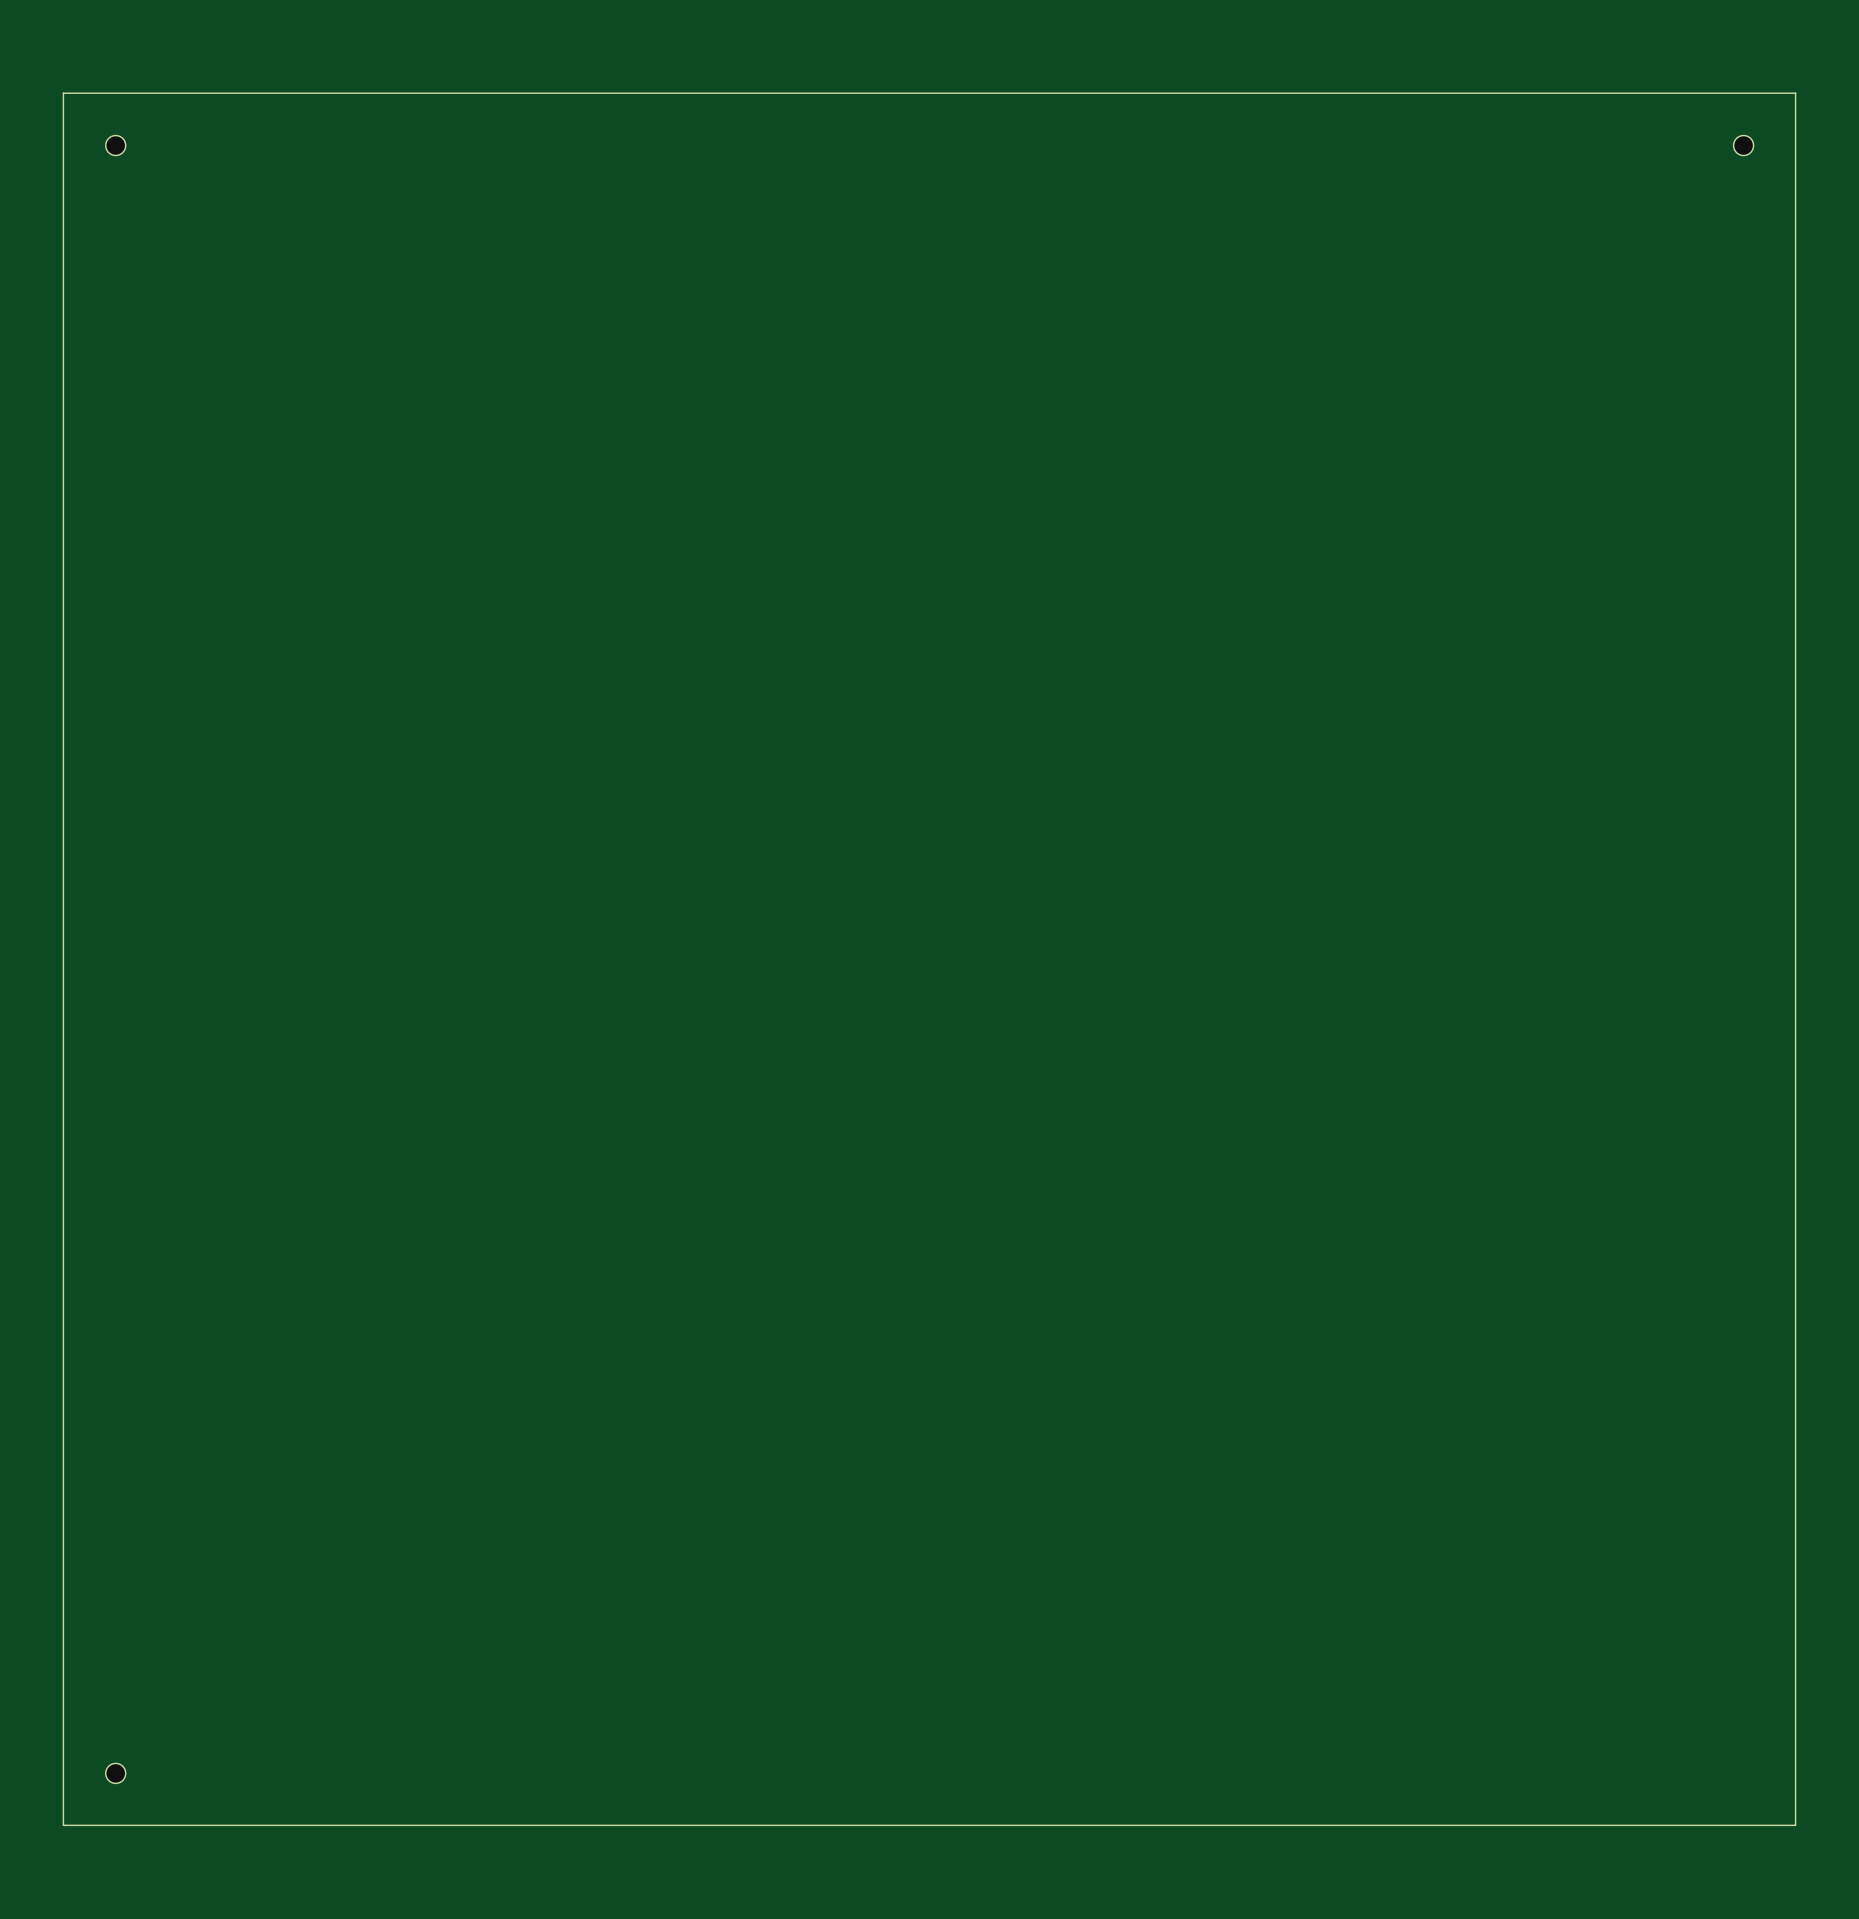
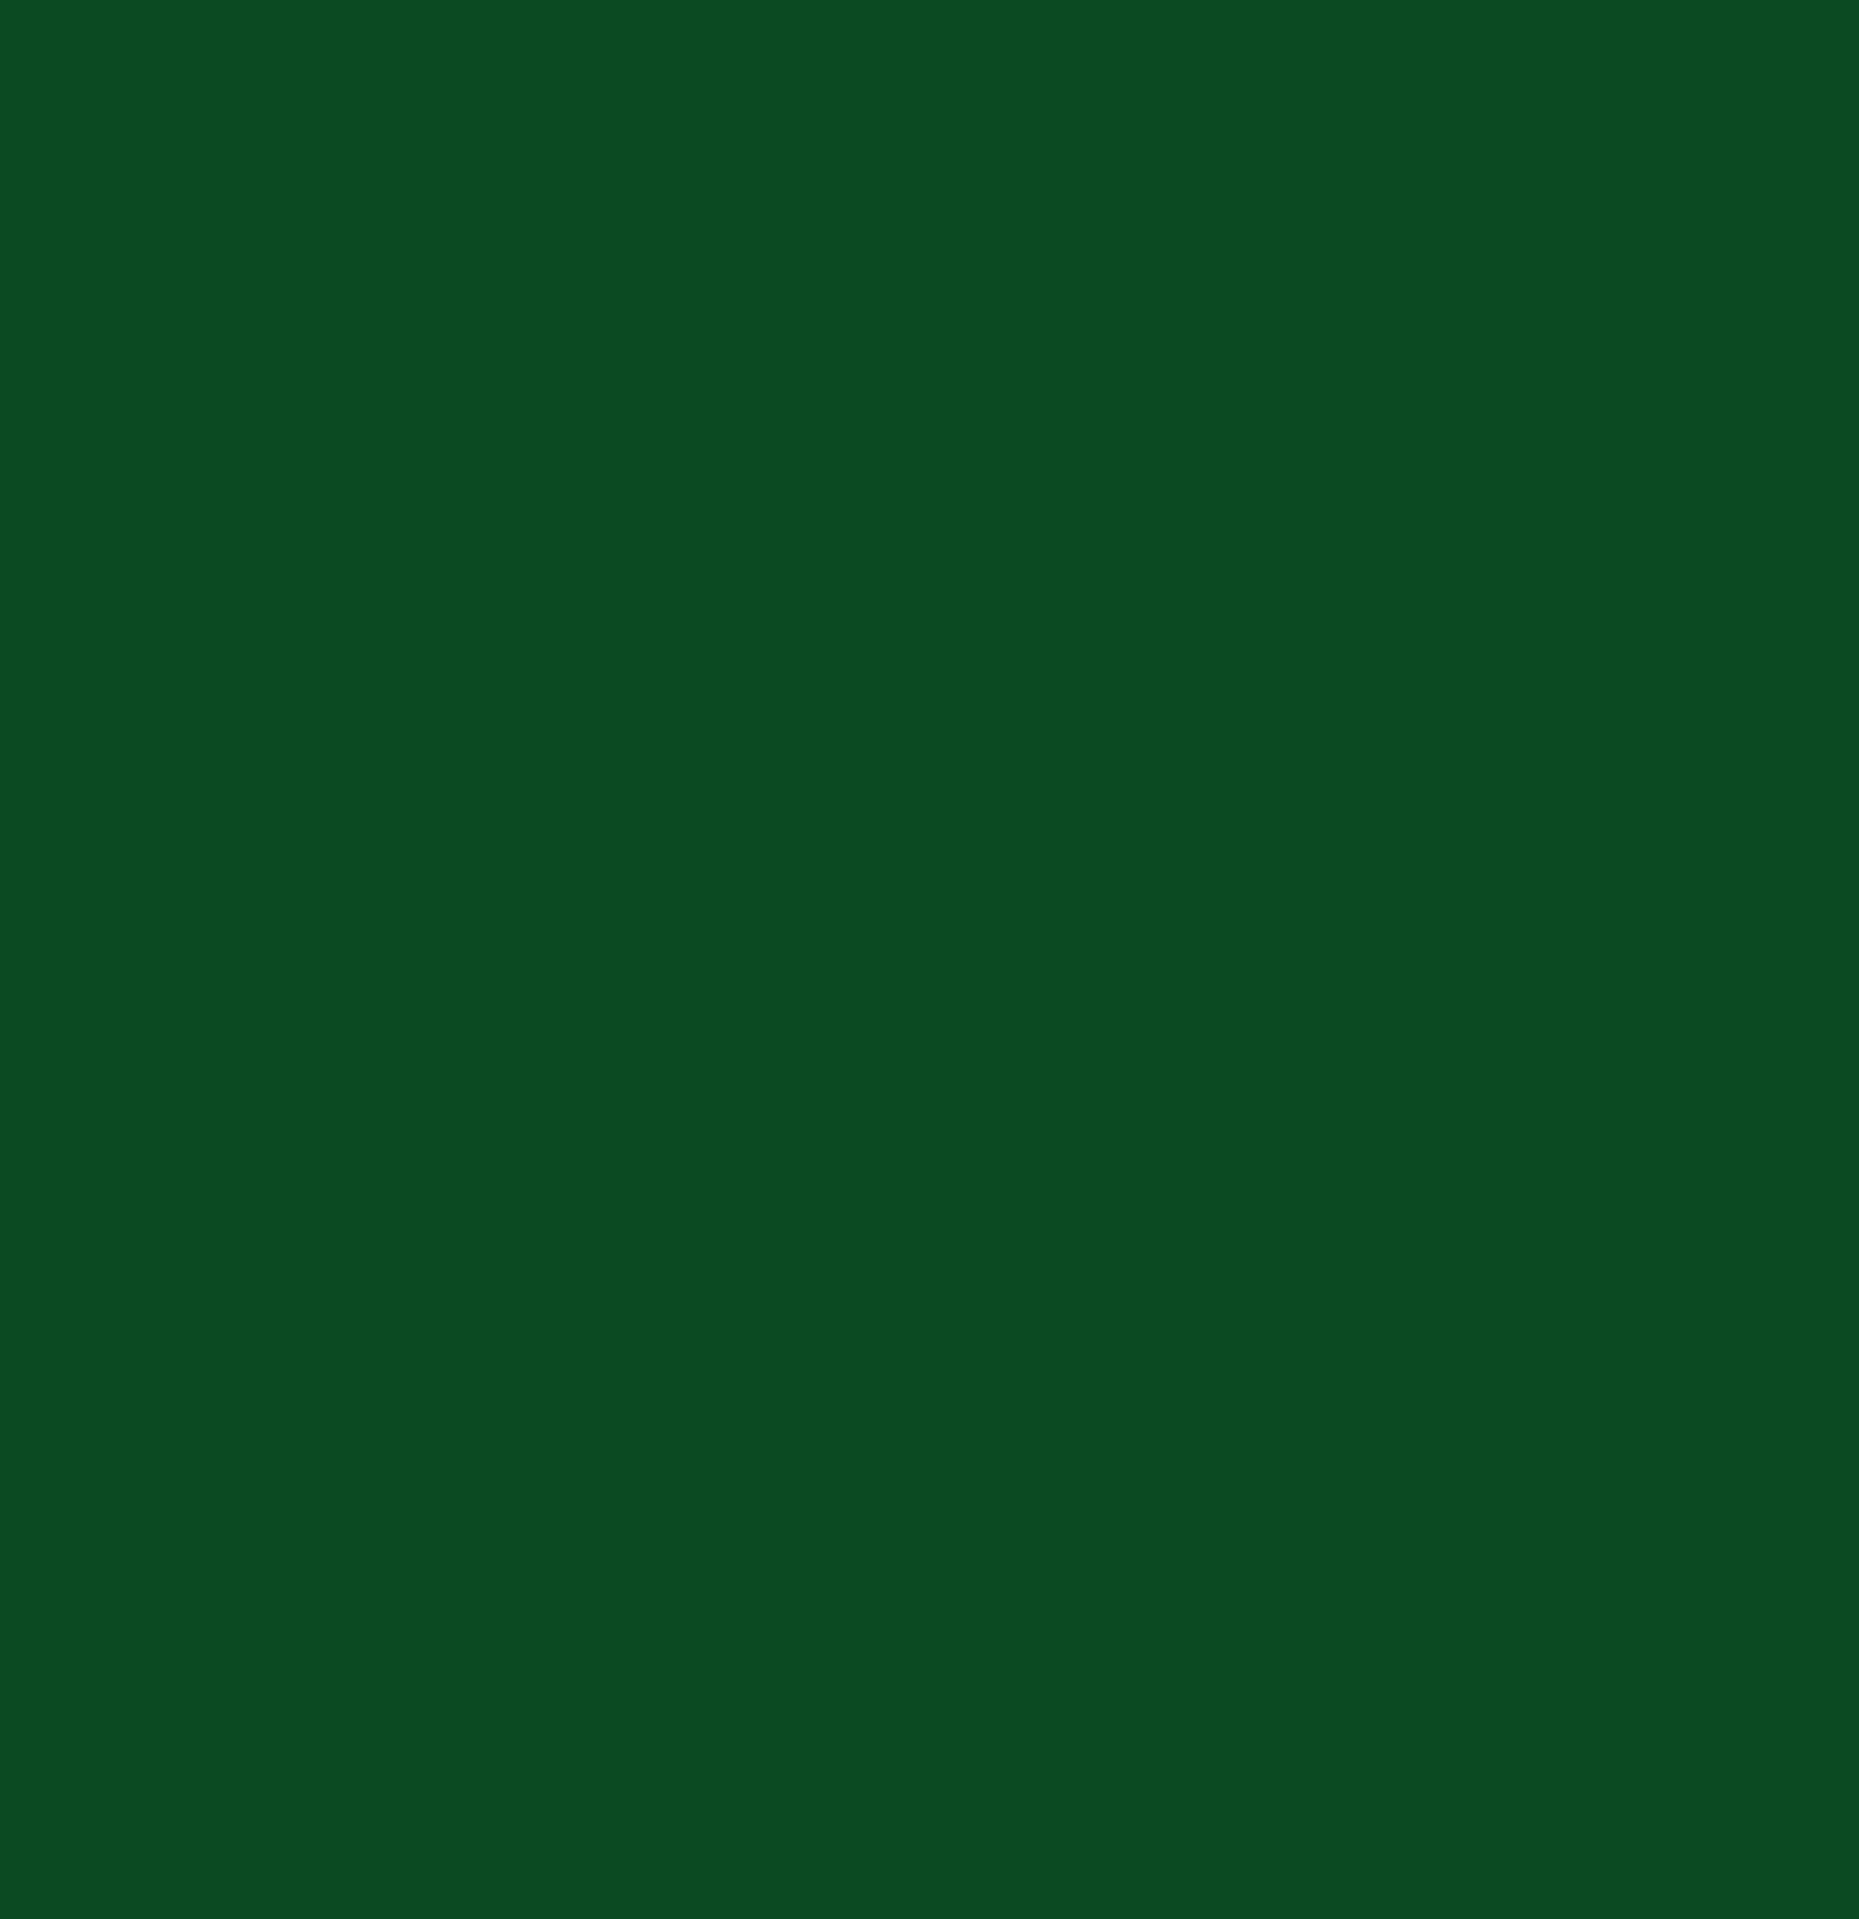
board edge: (63, 93) (1795, 93) (1795, 1825) (63, 1825) (63, 93) -> none
part: (115, 145) -> none
part: (1743, 145) -> none
part: (115, 1773) -> none

